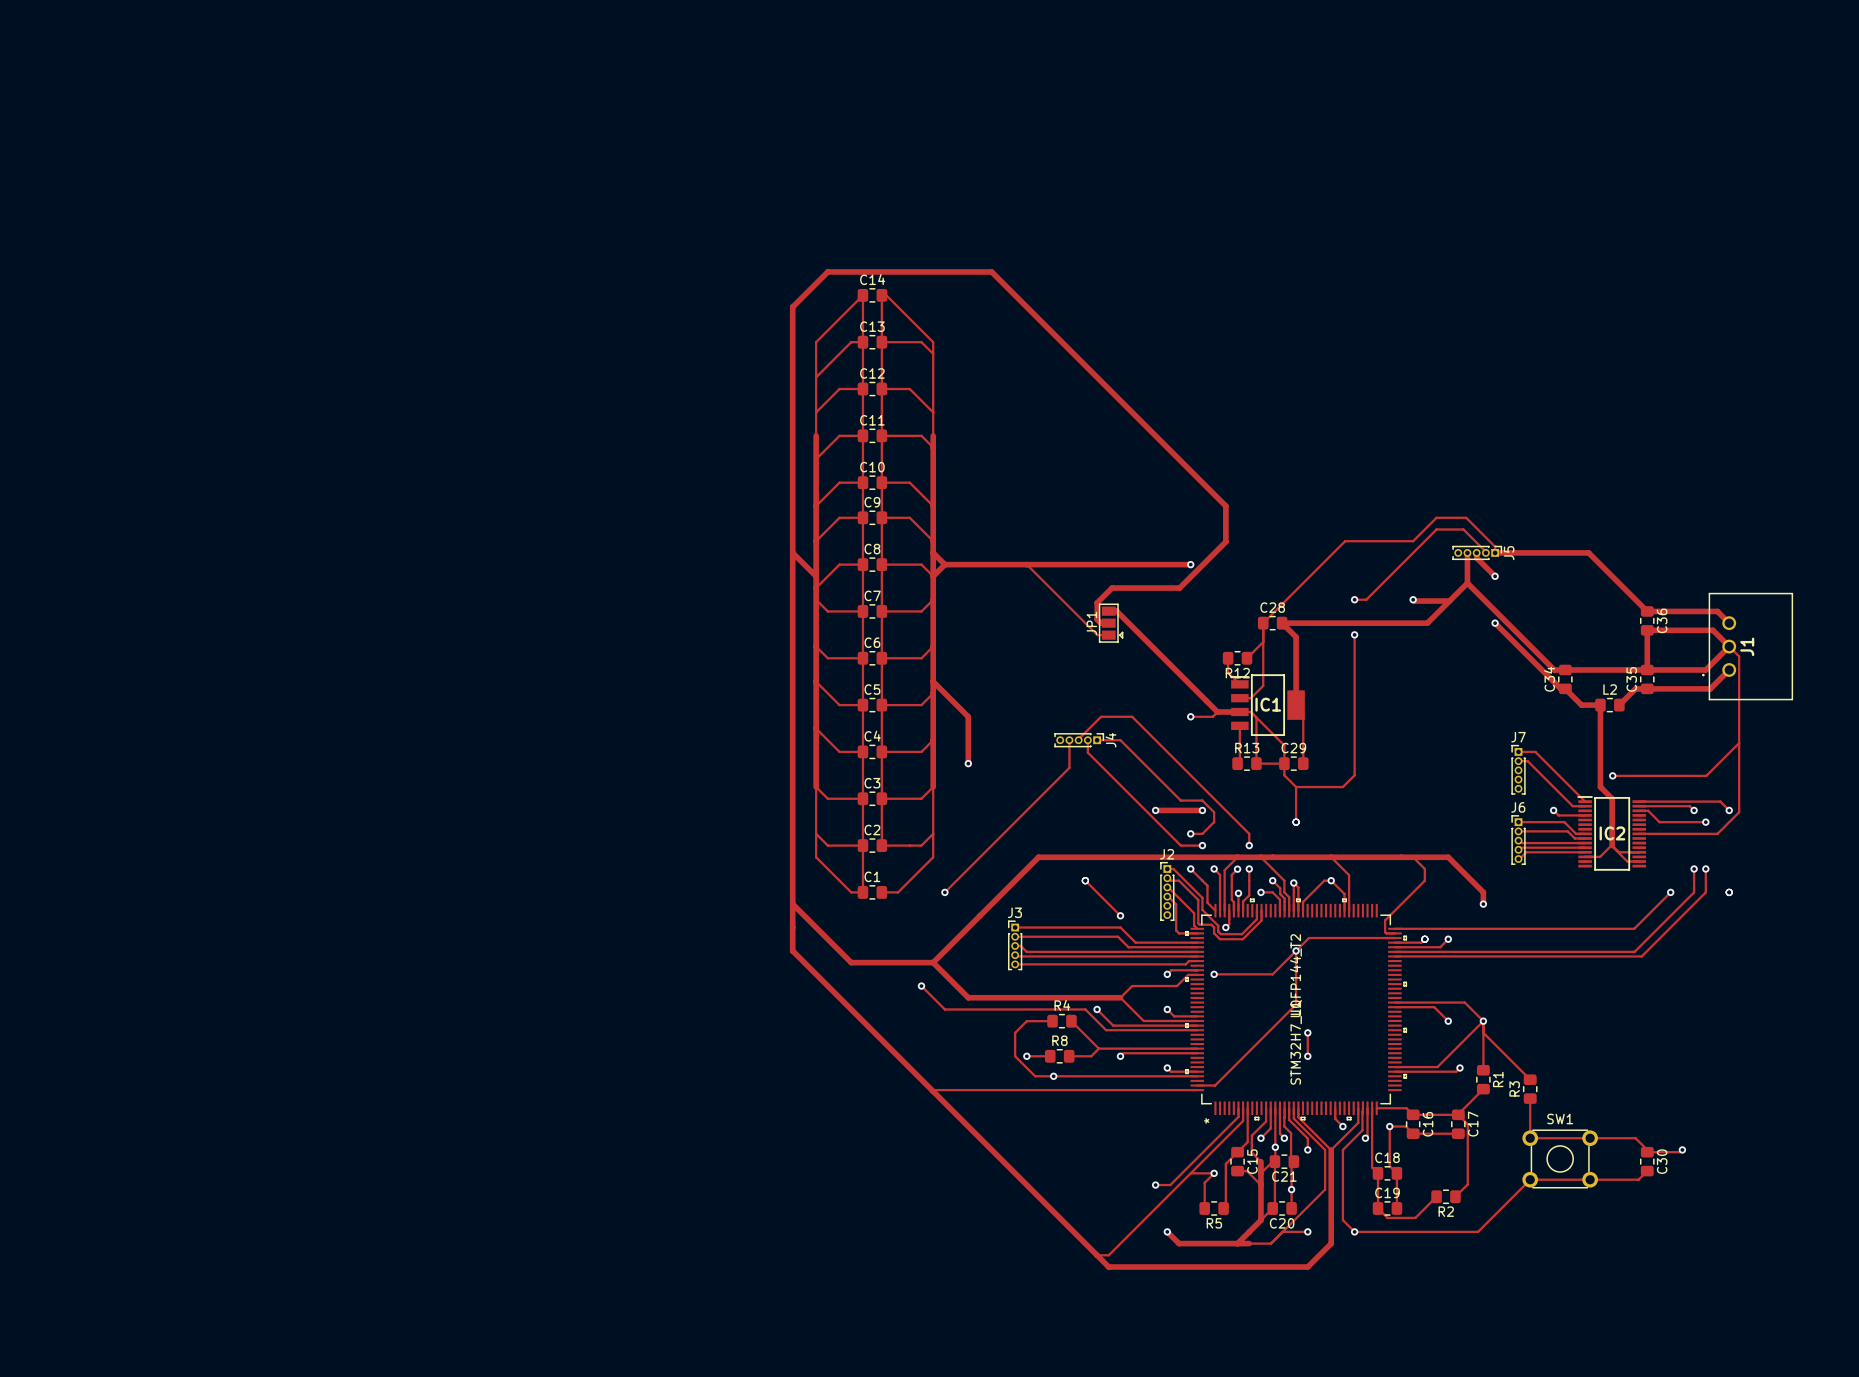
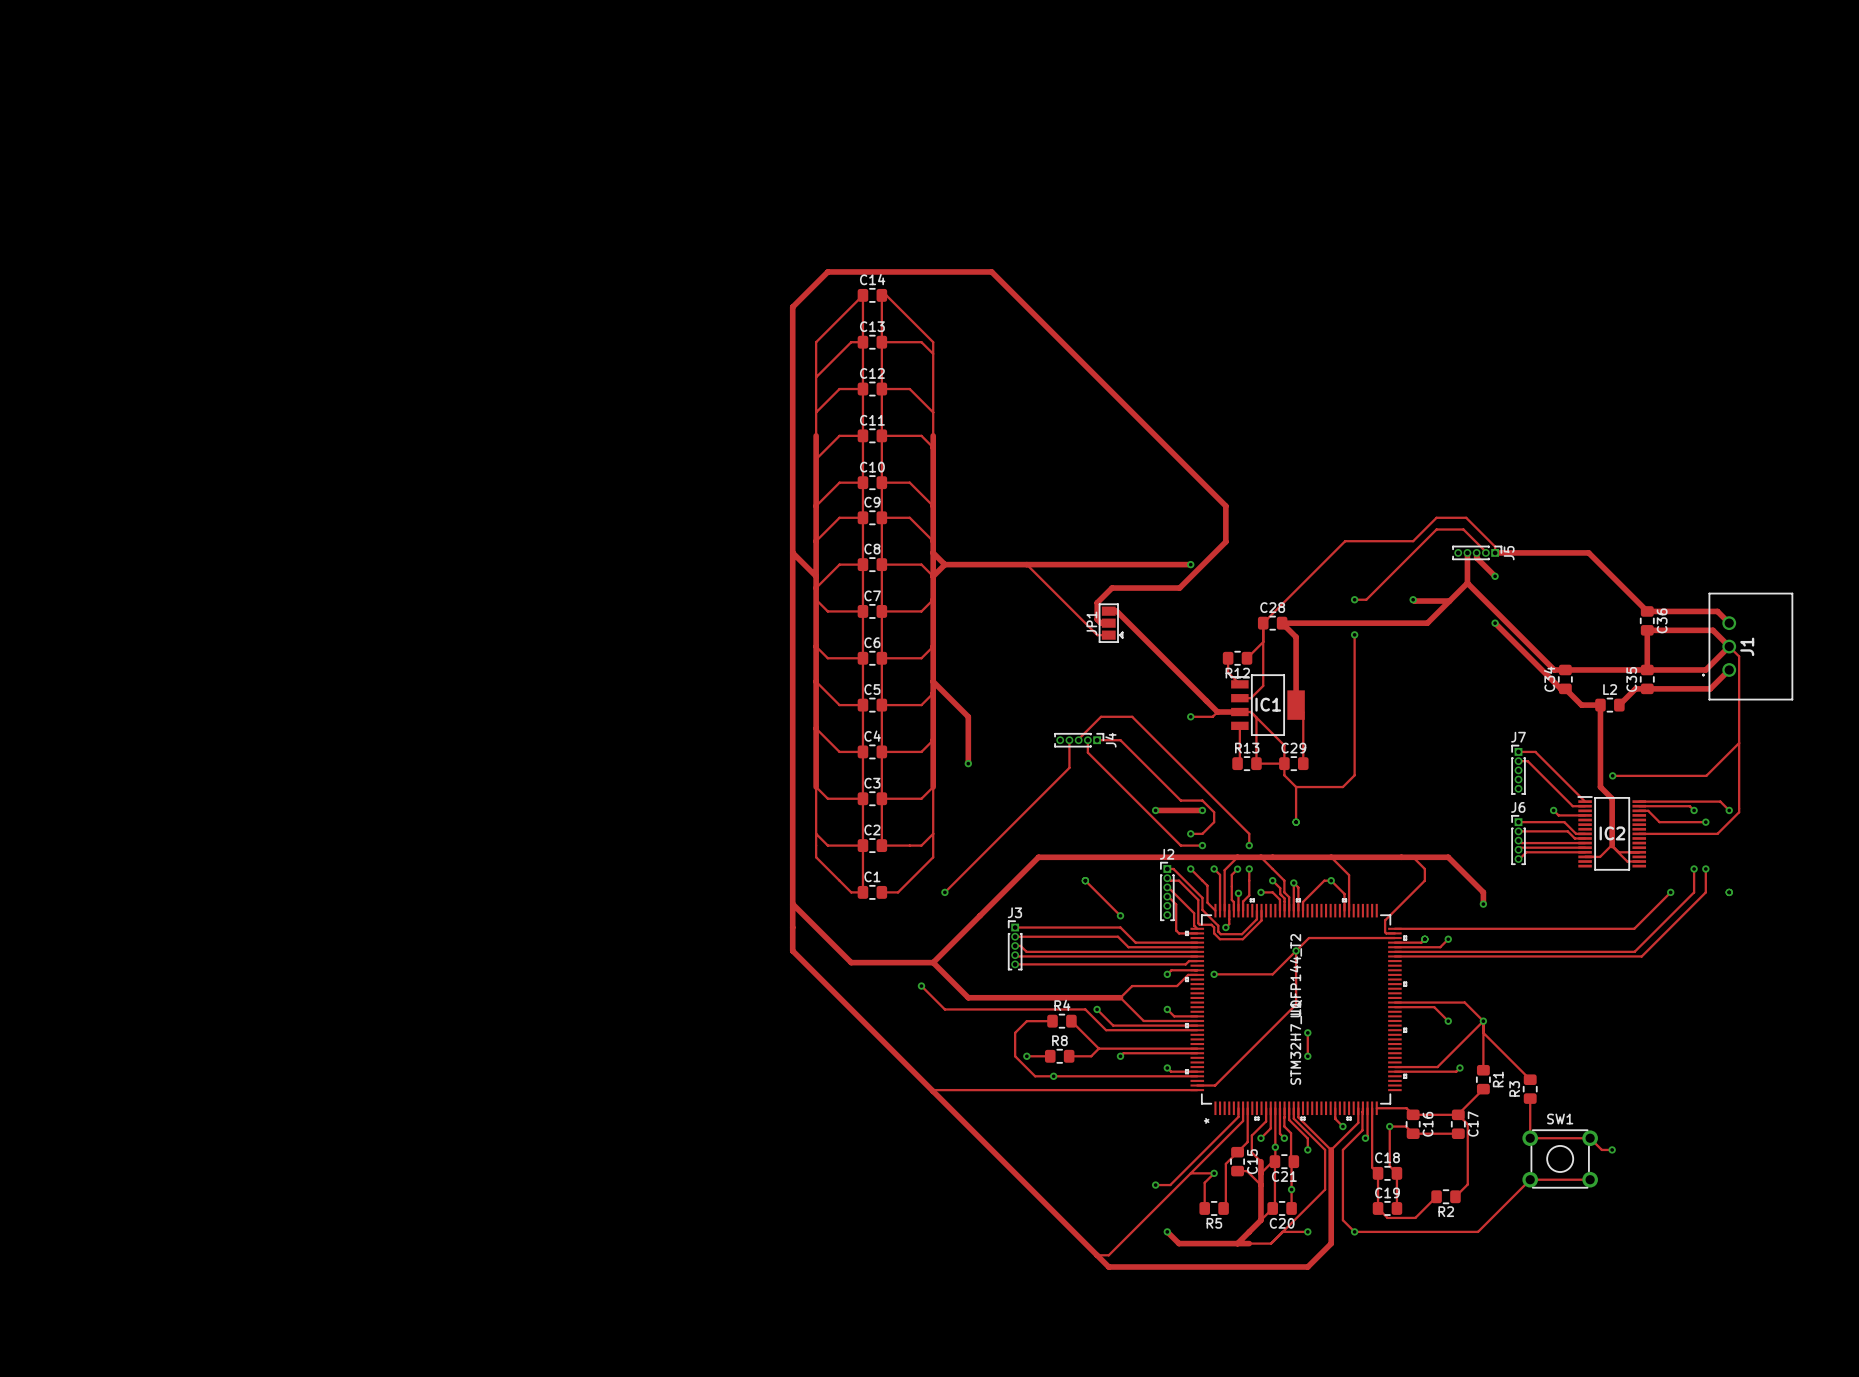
track: (1590, 1138) (1635, 1138) (1647, 1152) (1680, 1152) (1682, 1149) -> (1590, 1138) (1601, 1149) (1612, 1149)
via: none -> (1612, 1149)
via: (1682, 1149) -> none
C30: (1647, 1161) -> none
track: (1647, 1171) (1638, 1179) (1590, 1179) -> none

